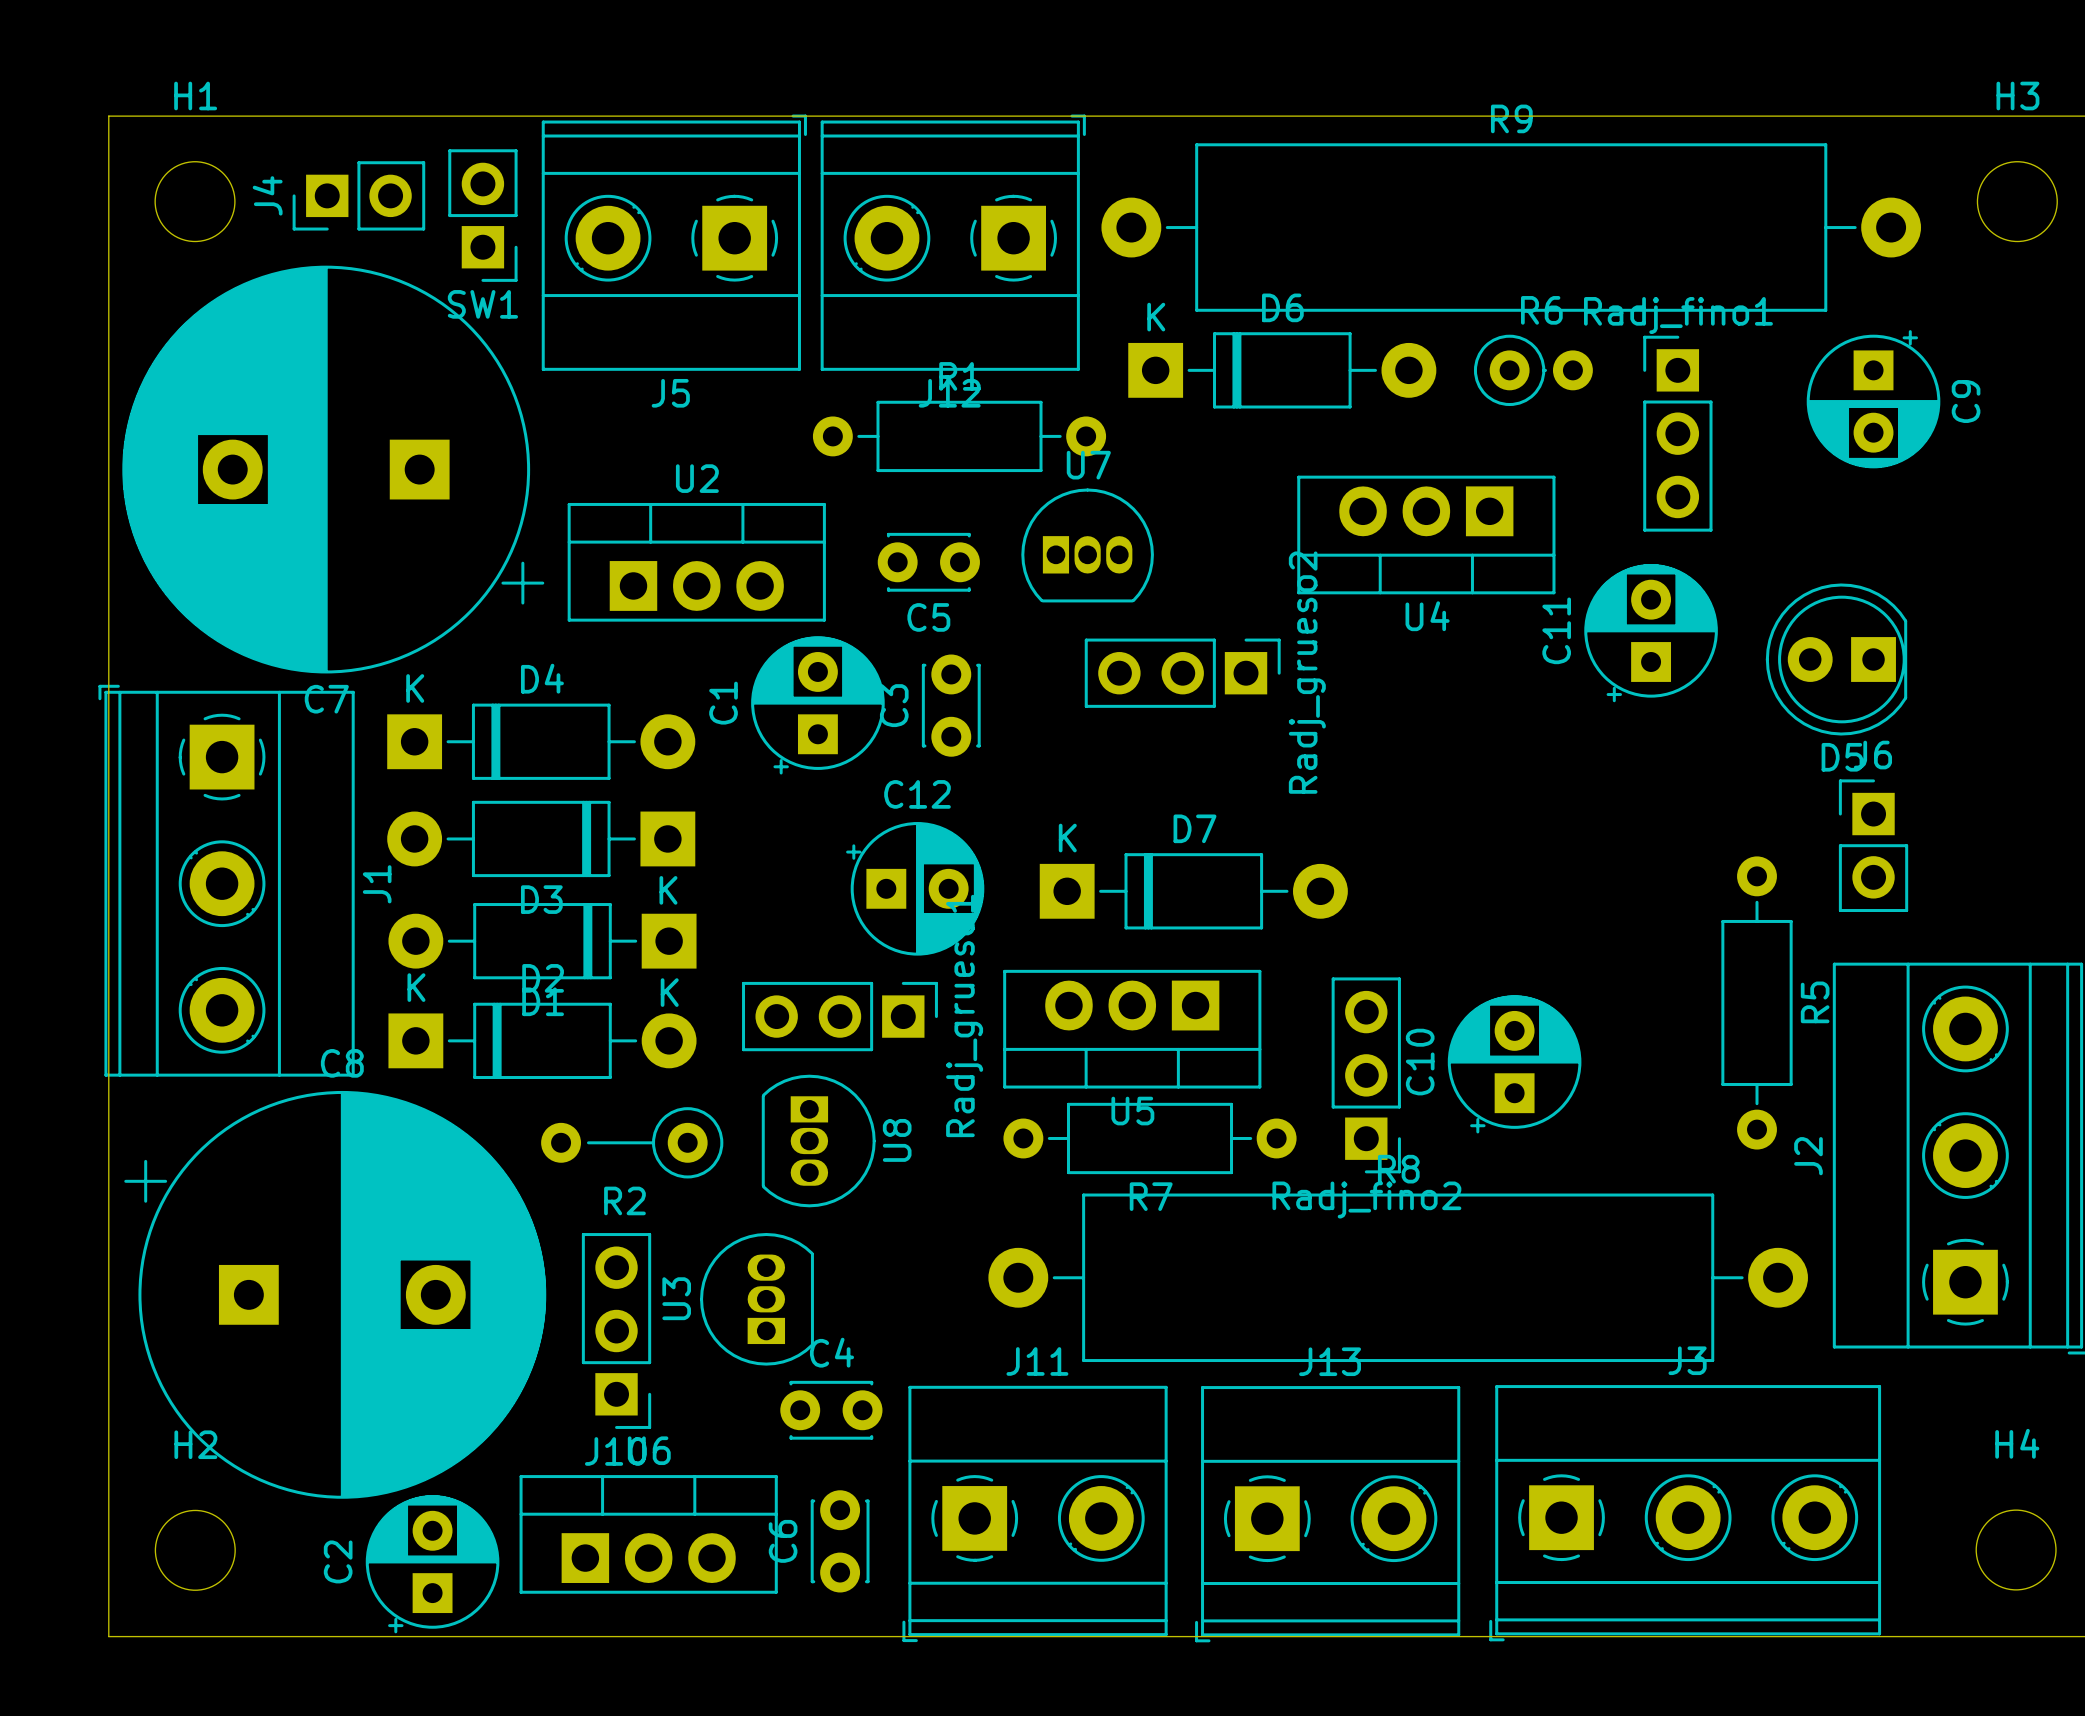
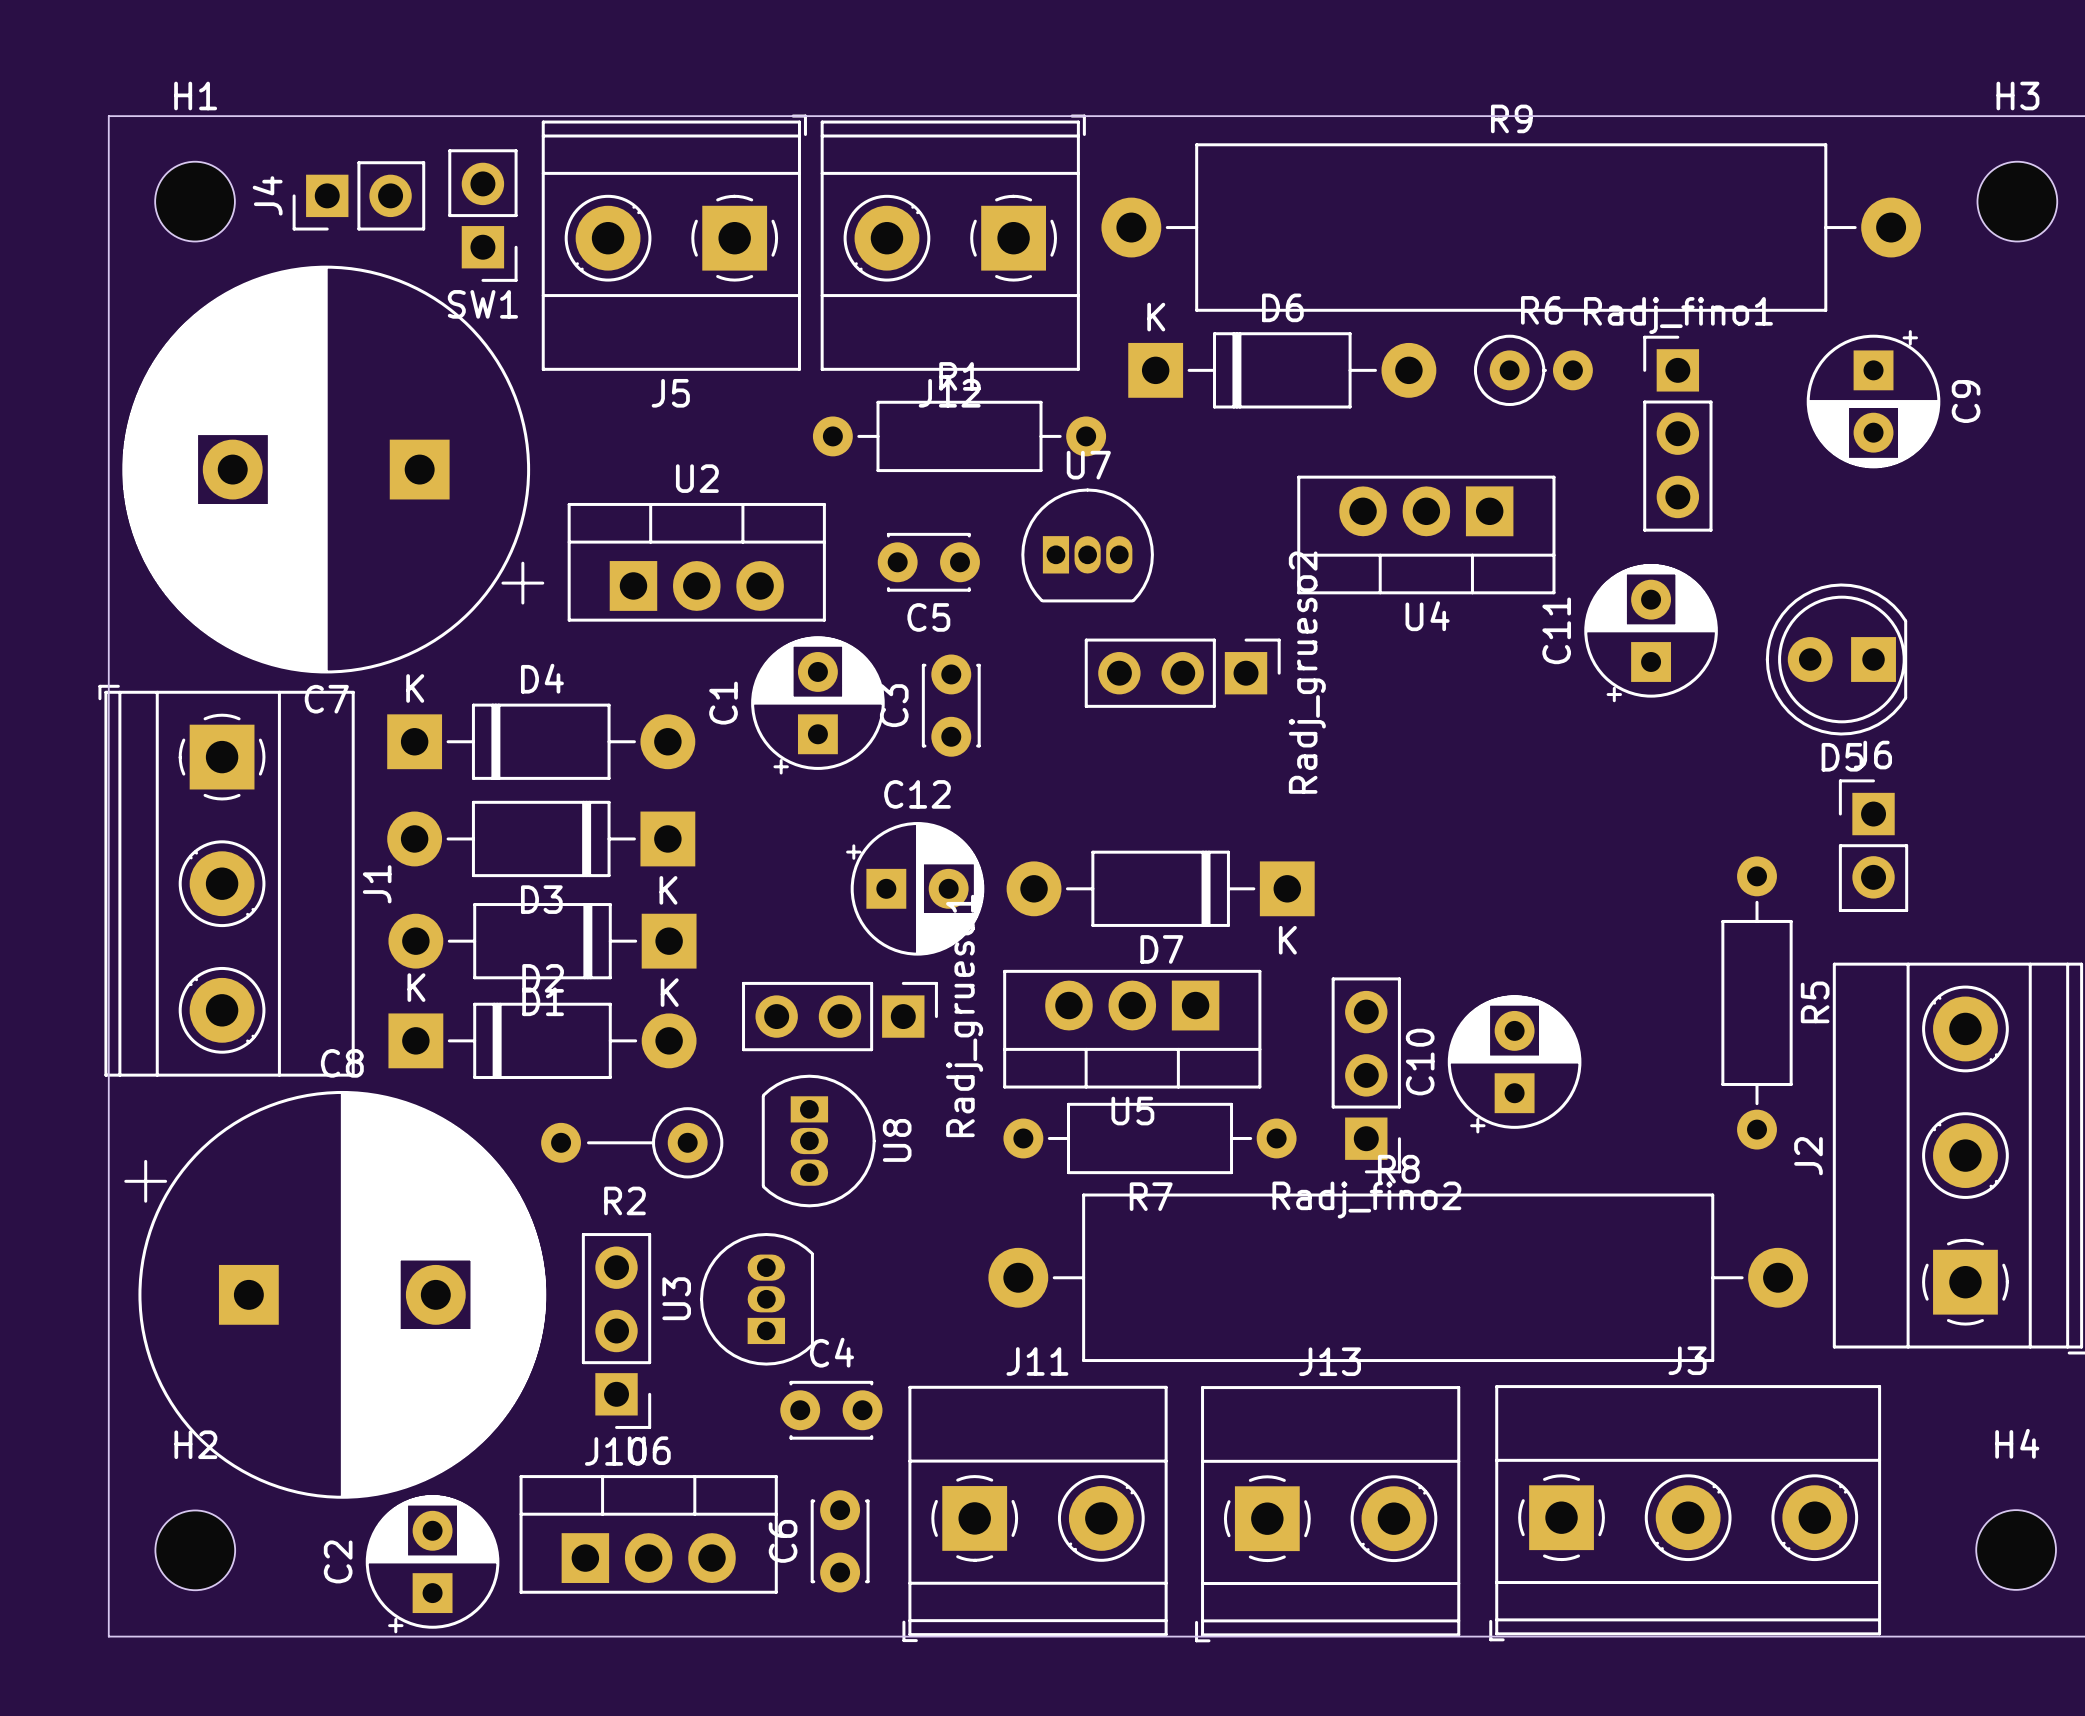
D7 rotation: 0° (1193, 891) -> 180° (1160, 888)

